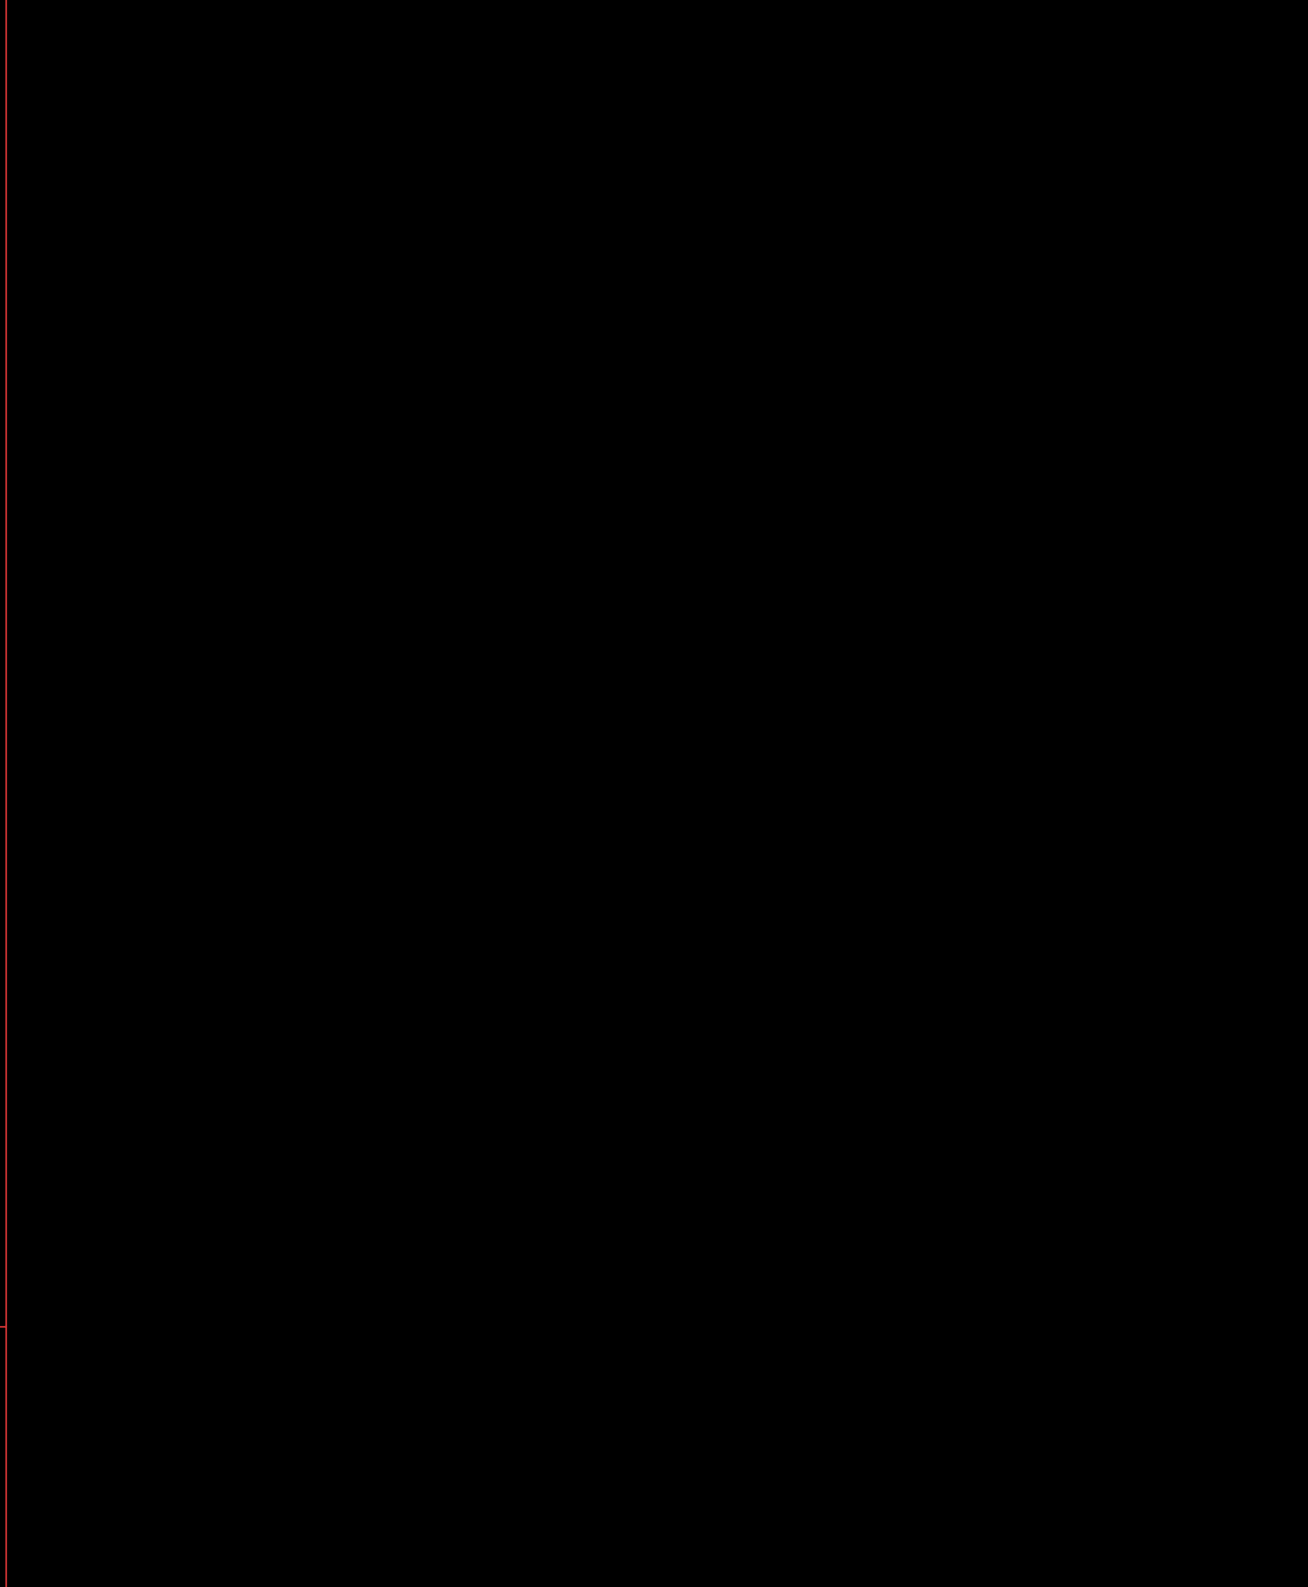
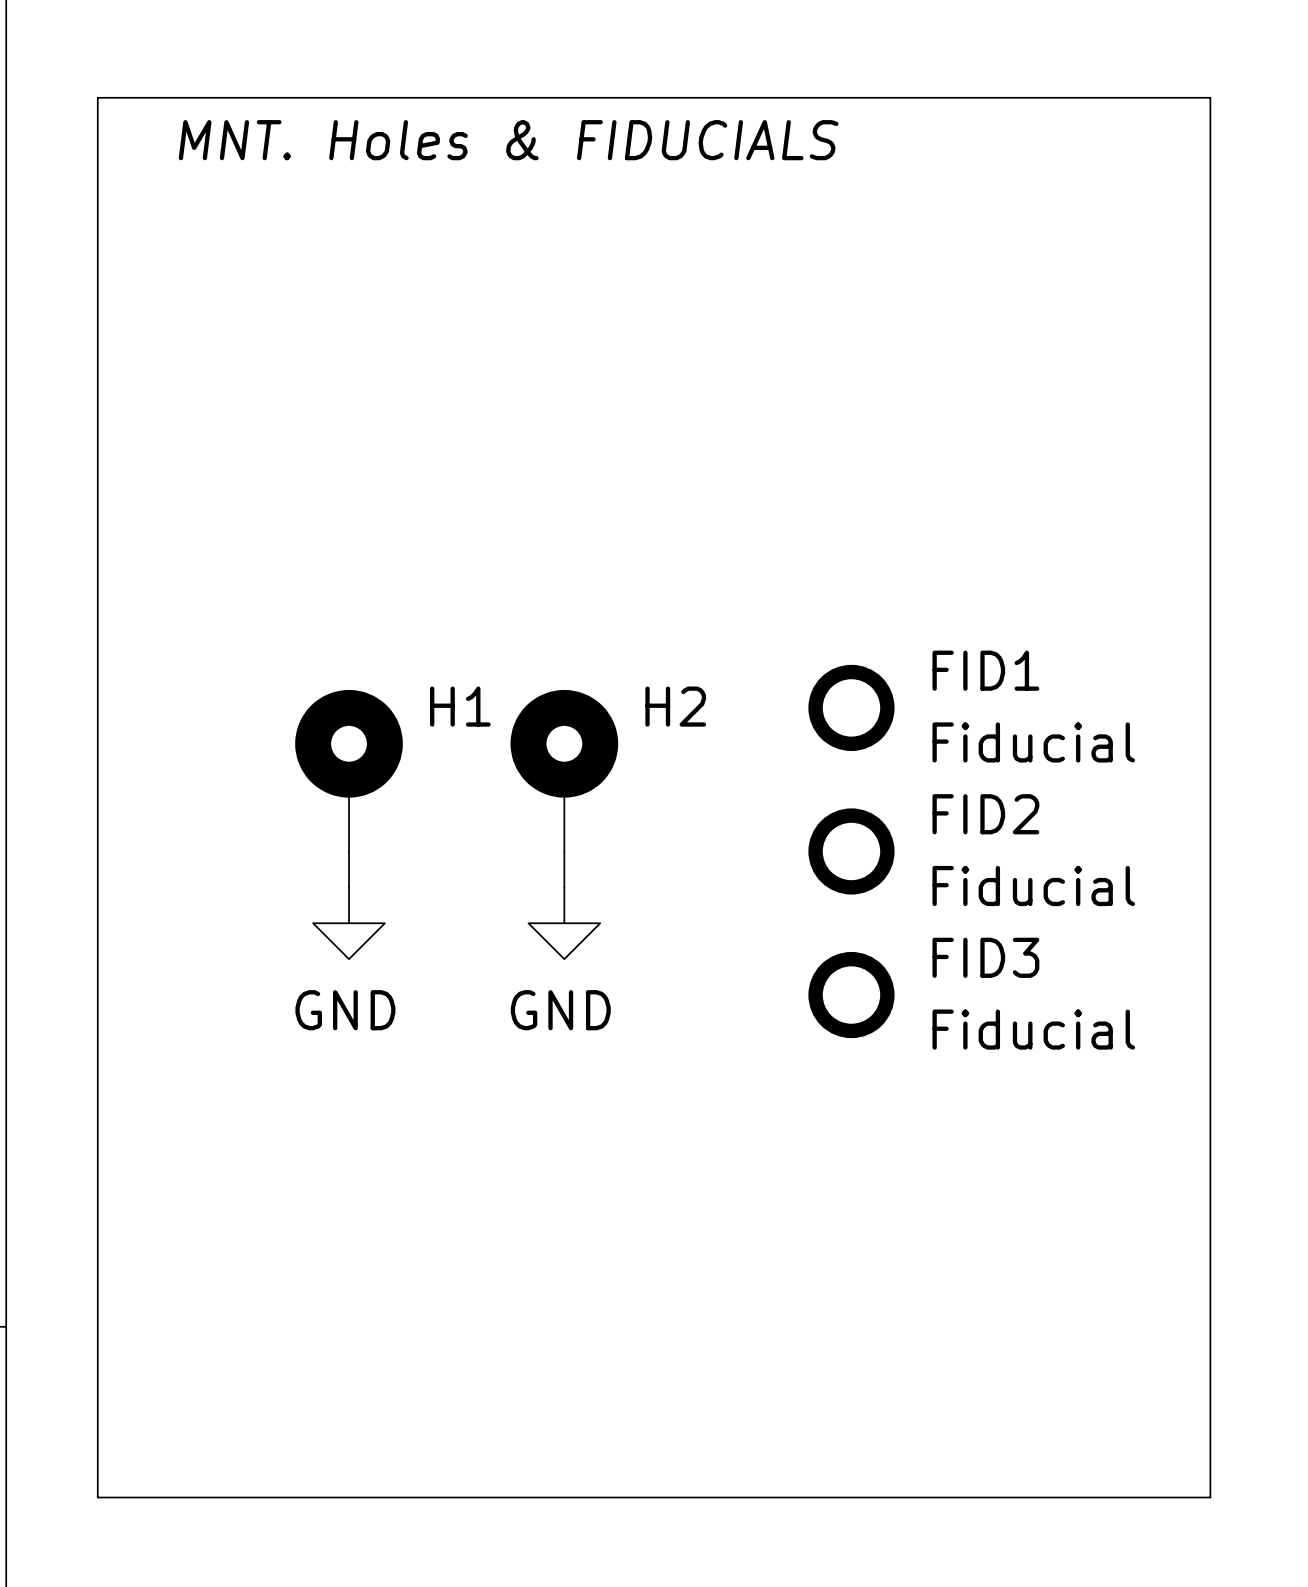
line: none -> (97, 97) (97, 1497) (1210, 1497) (1210, 97) (97, 97)
text: none -> MNT. Holes & FIDUCIALS (508, 140)
FID1: none -> Fiducial (851, 707)
H1: none -> (349, 770)
H2: none -> (564, 770)
wire: none -> (349, 851) (349, 887)
wire: none -> (564, 851) (564, 887)
FID2: none -> Fiducial (851, 851)
power symbol: none -> GND (349, 923)
power symbol: none -> GND (564, 923)
FID3: none -> Fiducial (851, 995)

